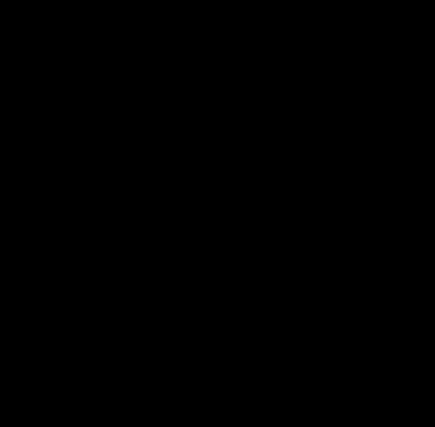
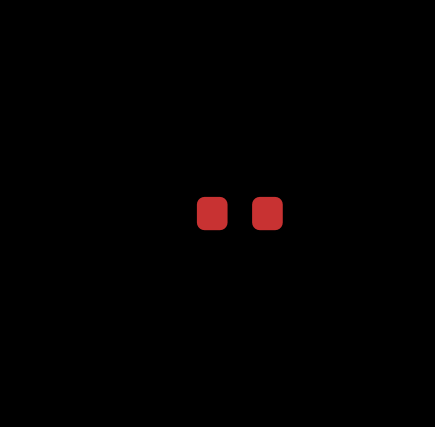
part: none -> (239, 213)

